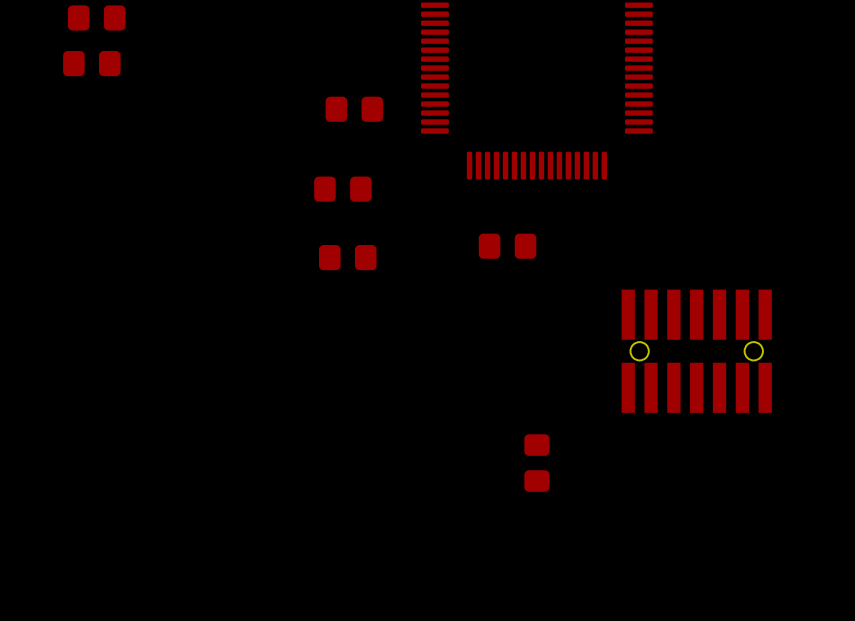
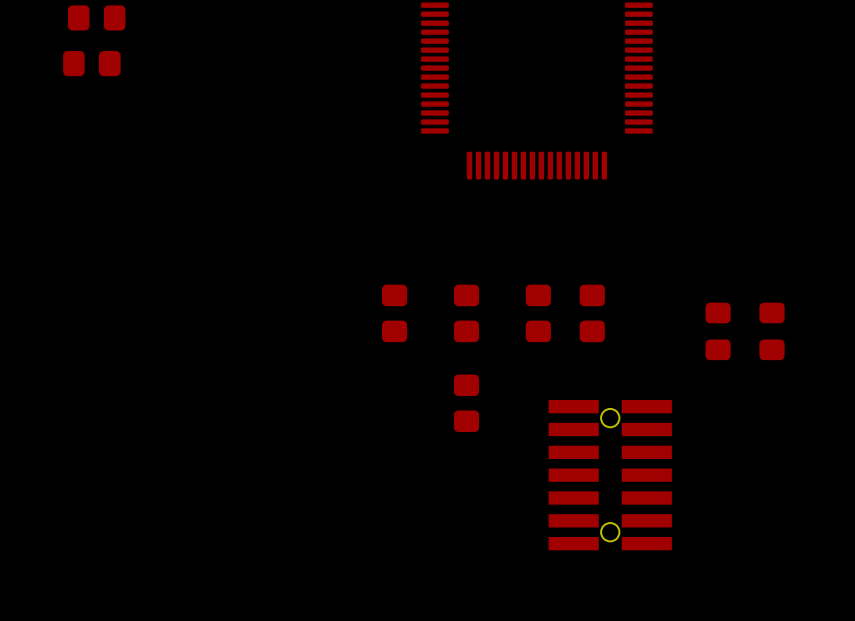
part: (354, 109) -> none
part: (342, 189) -> none
part: (507, 246) -> none
part: (347, 257) -> none
part: none -> (394, 313)
part: none -> (466, 313)
part: none -> (538, 313)
part: none -> (592, 313)
part: none -> (718, 331)
part: none -> (772, 331)
part rotation: 0° (696, 351) -> 90° clockwise (610, 475)
part position: (696, 351) -> (610, 475)
part: none -> (466, 403)
part: (536, 463) -> none

